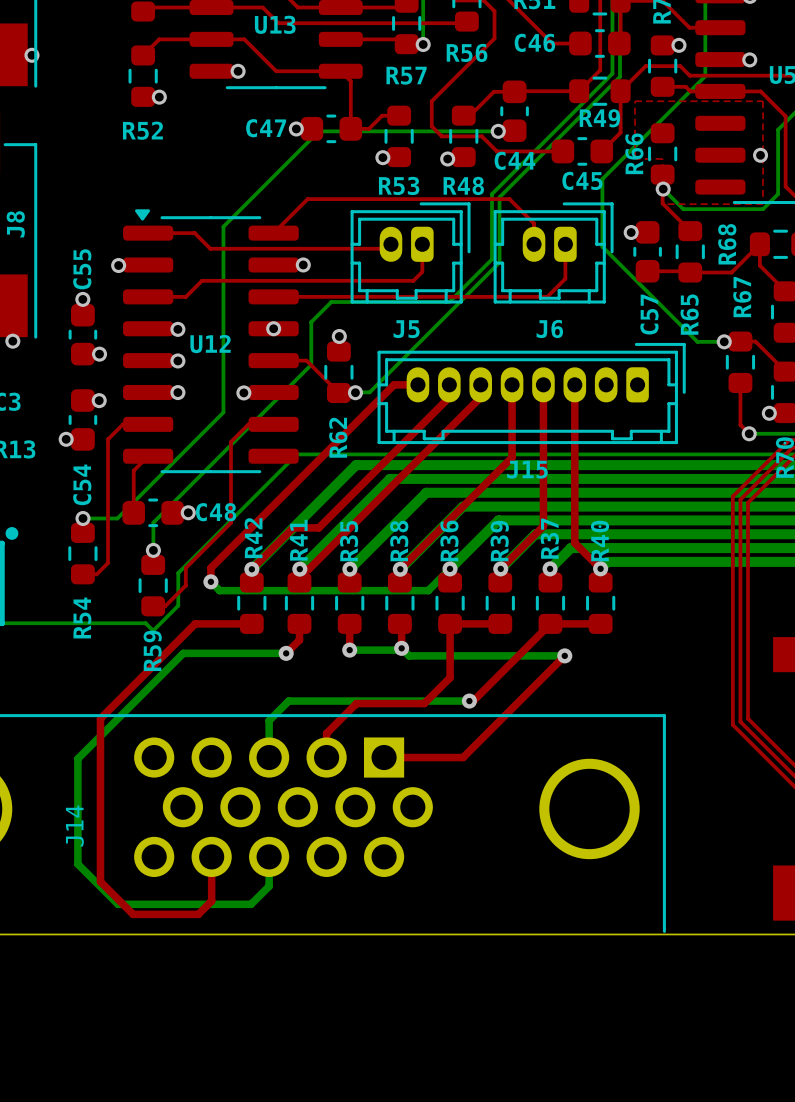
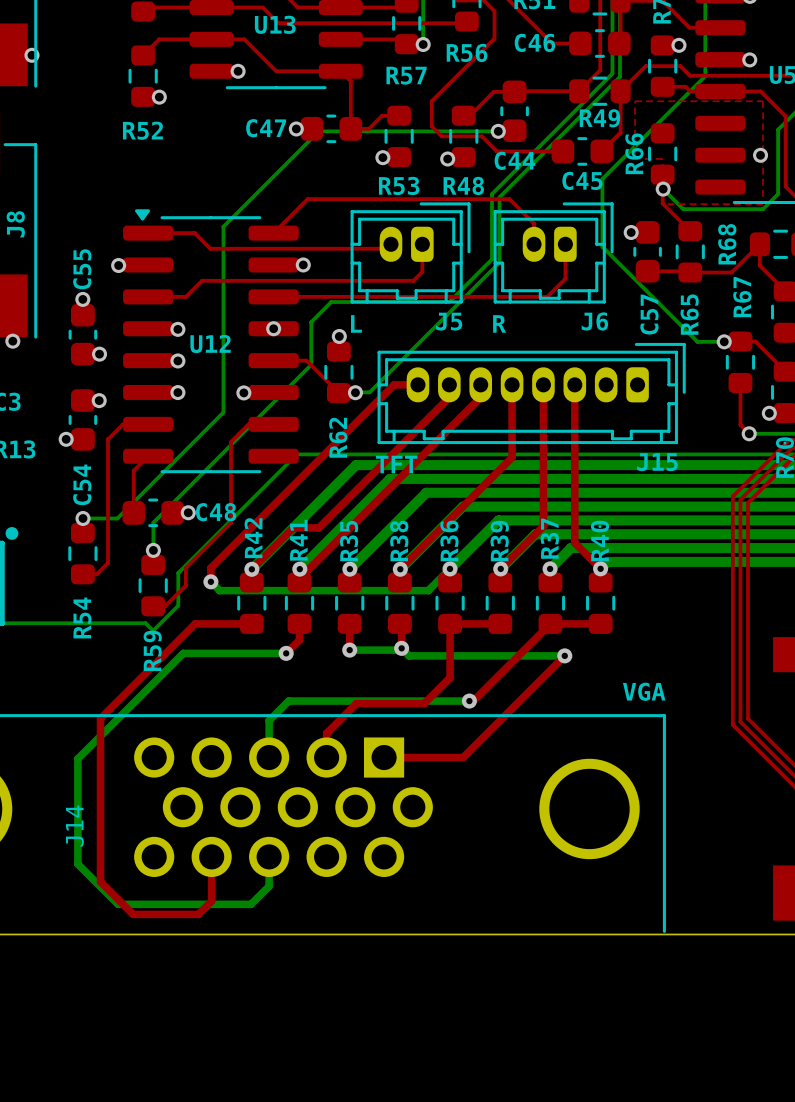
text: none -> L (356, 323)
text: none -> R (499, 323)
J5 name position: J5 (406, 329) -> J5 (449, 321)
J6 name position: J6 (549, 329) -> J6 (594, 321)
text: none -> TFT (396, 464)
J15 name position: J15 (527, 469) -> J15 (657, 462)
text: none -> VGA (644, 691)

